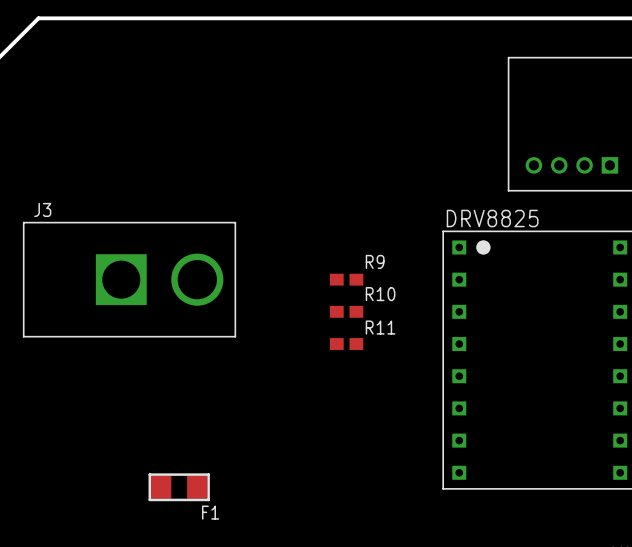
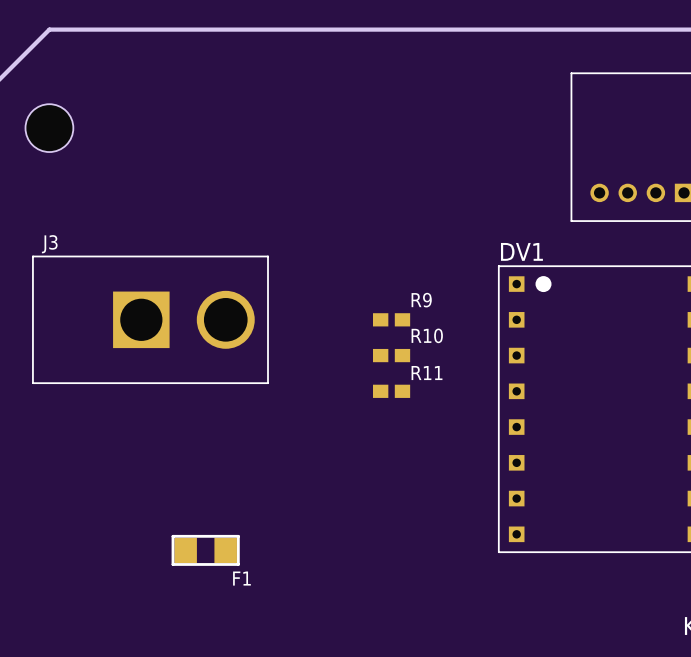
hole: none -> (49, 128)
DV1 name: none -> DV1 (521, 251)
DV1 text: DRV8825 (492, 218) -> none

